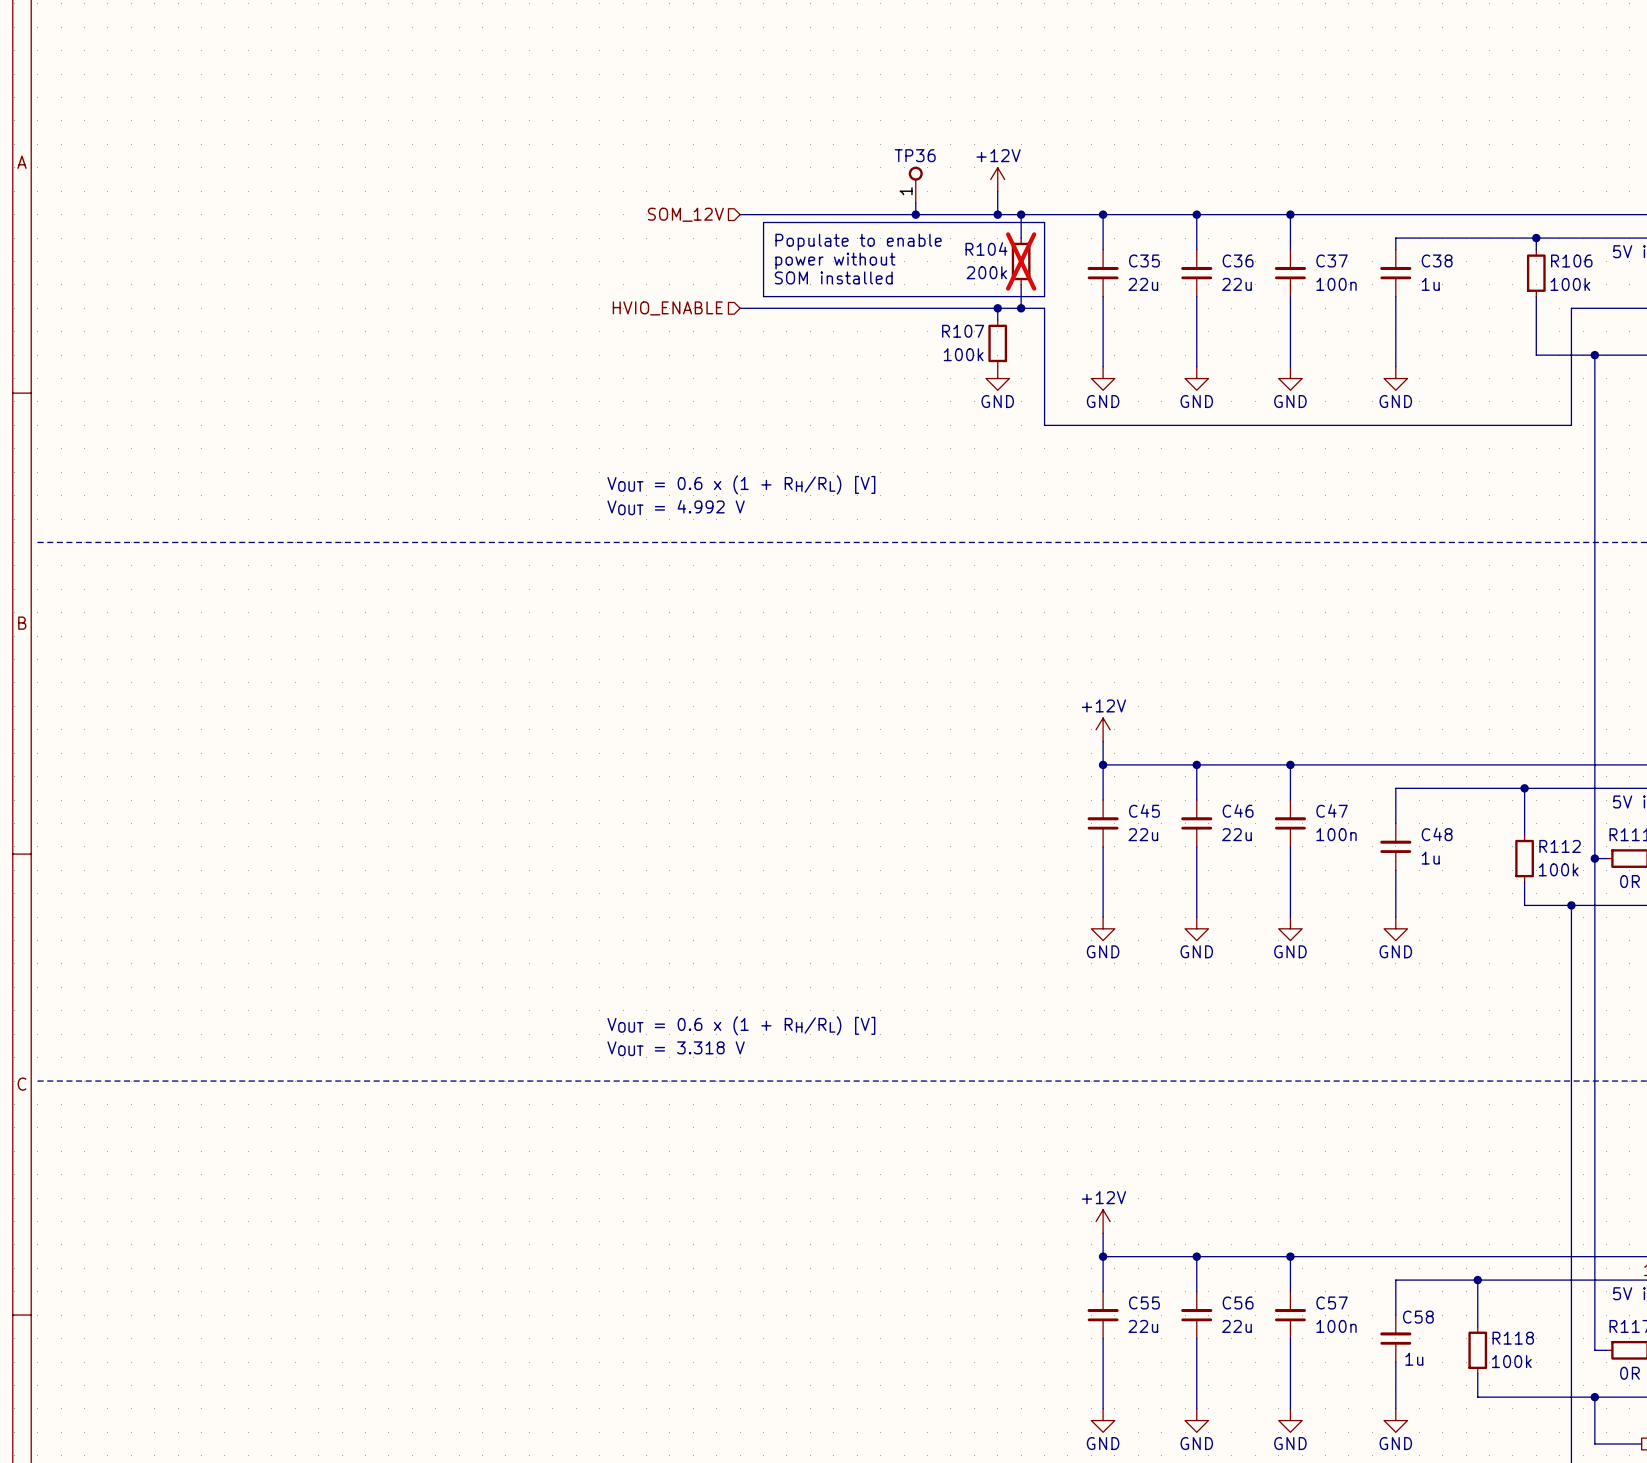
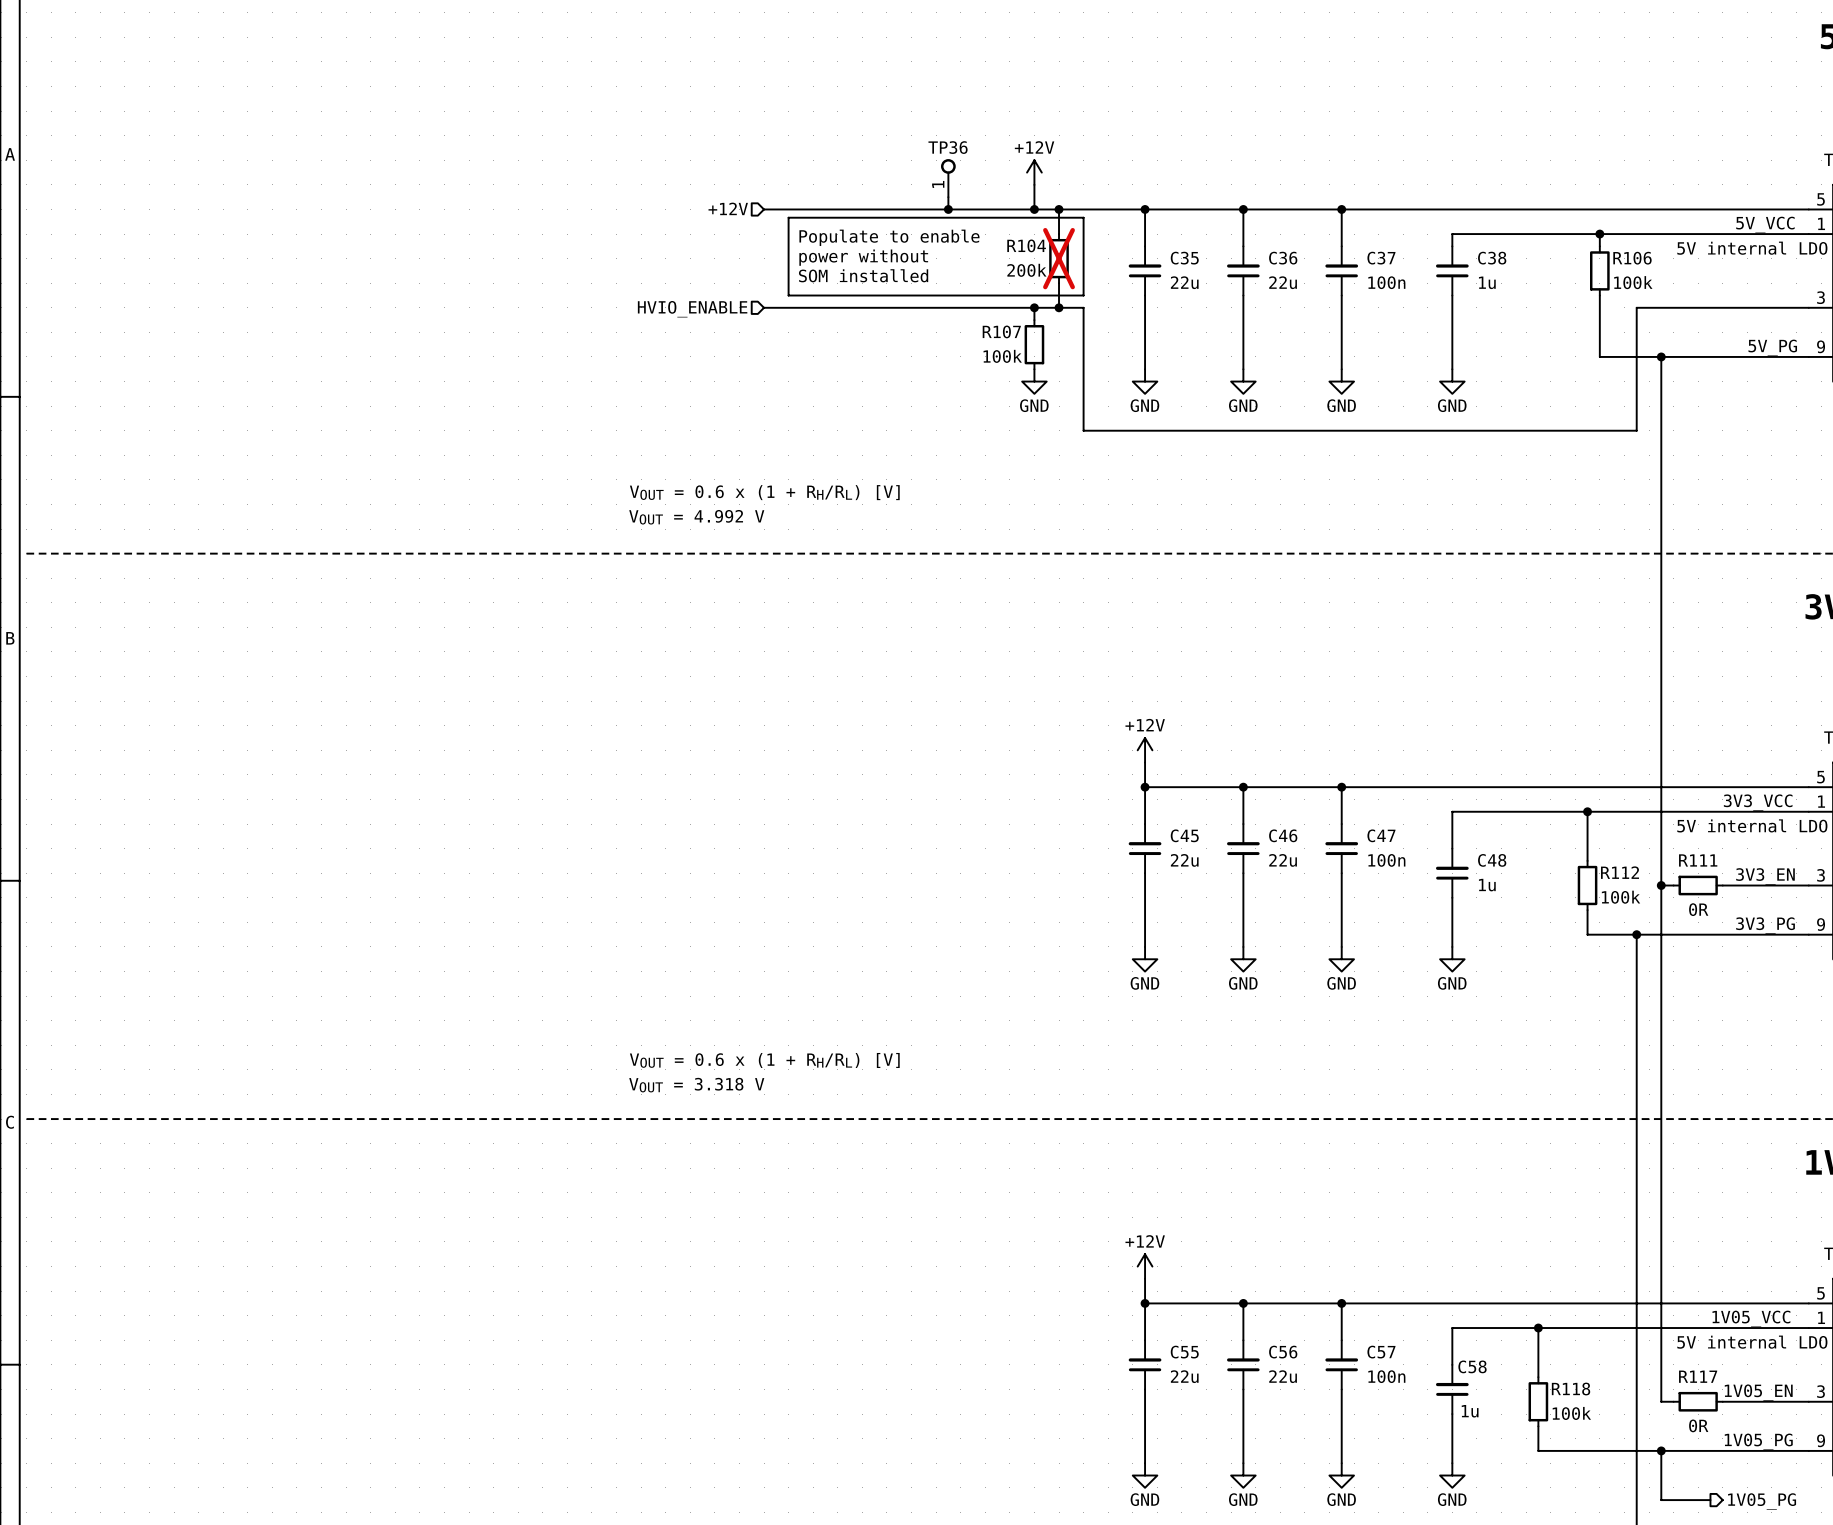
hierarchical label: SOM_12V (685, 214) -> +12V (728, 208)

